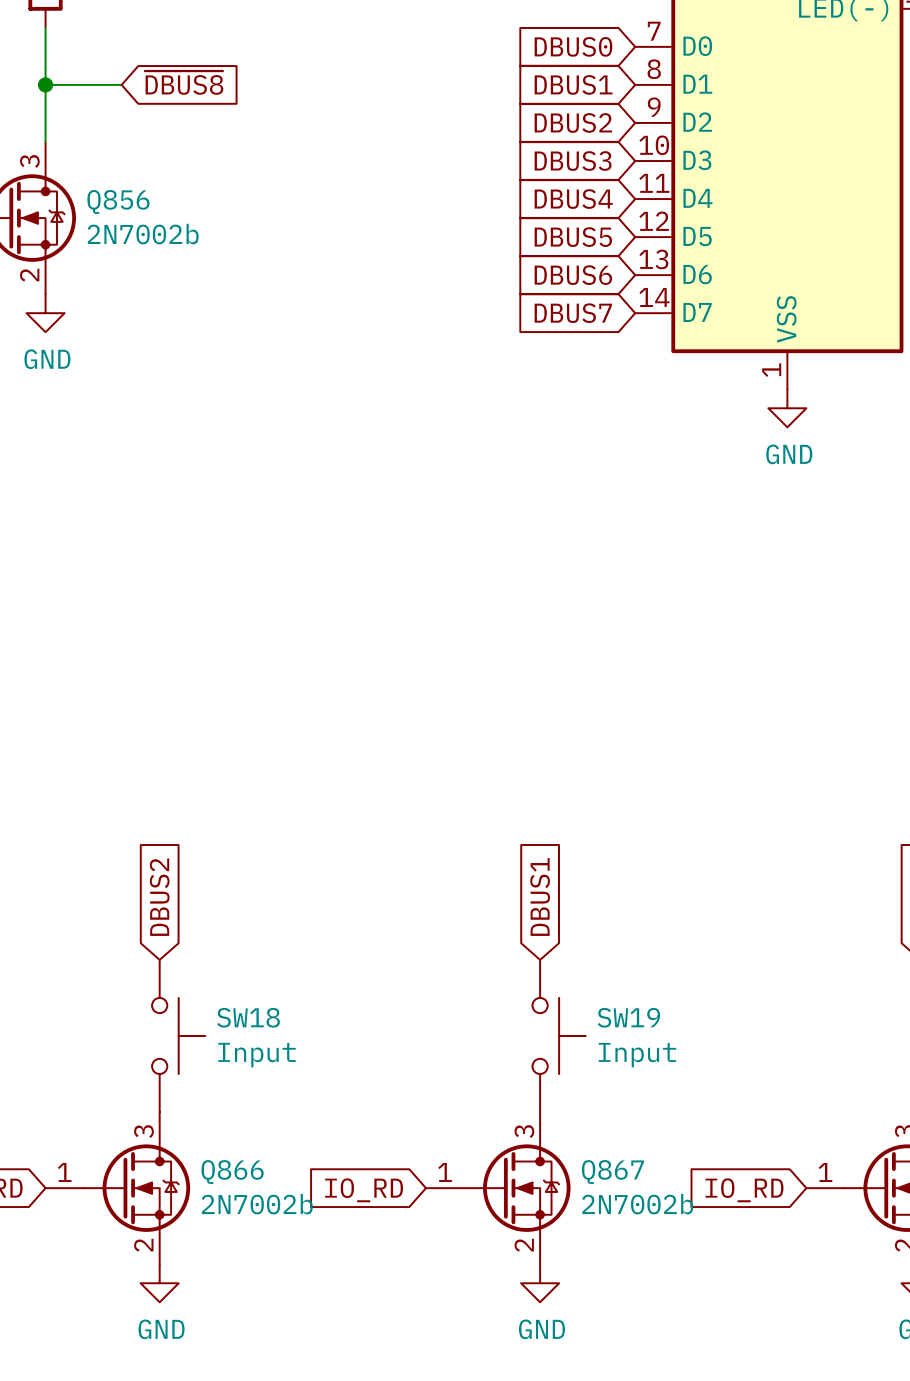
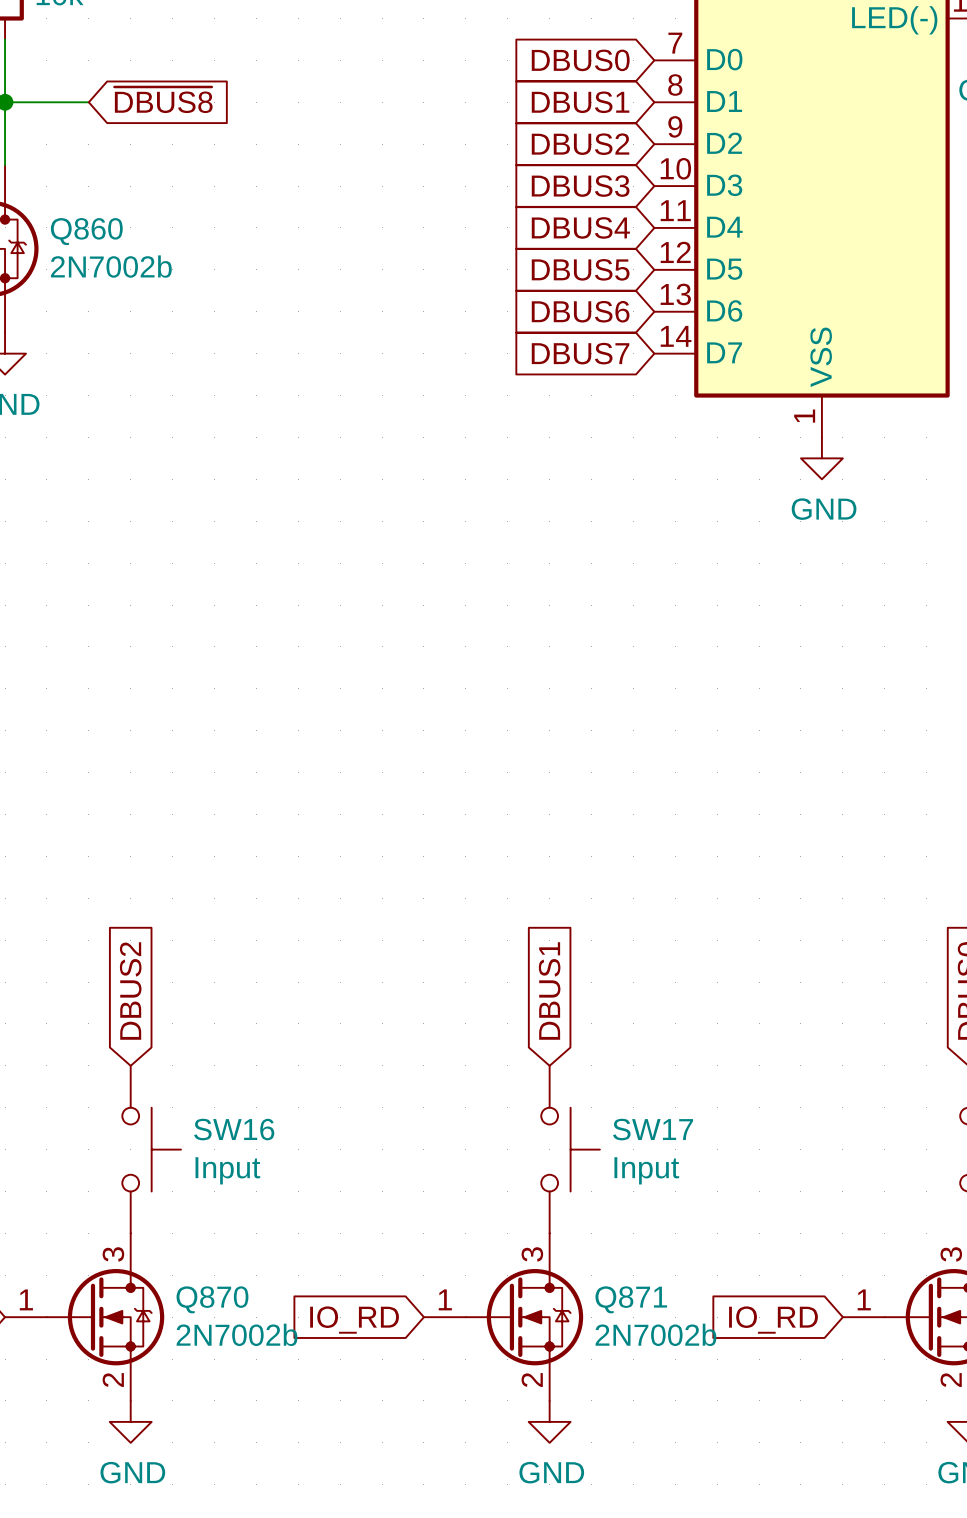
Q856 name: Q856 (118, 201) -> Q860 (86, 231)
SW18 name: SW18 (248, 1017) -> SW16 (234, 1129)
SW19 name: SW19 (628, 1017) -> SW17 (653, 1129)
Q866 name: Q866 (232, 1172) -> Q870 (212, 1299)
Q867 name: Q867 (612, 1172) -> Q871 (631, 1299)

